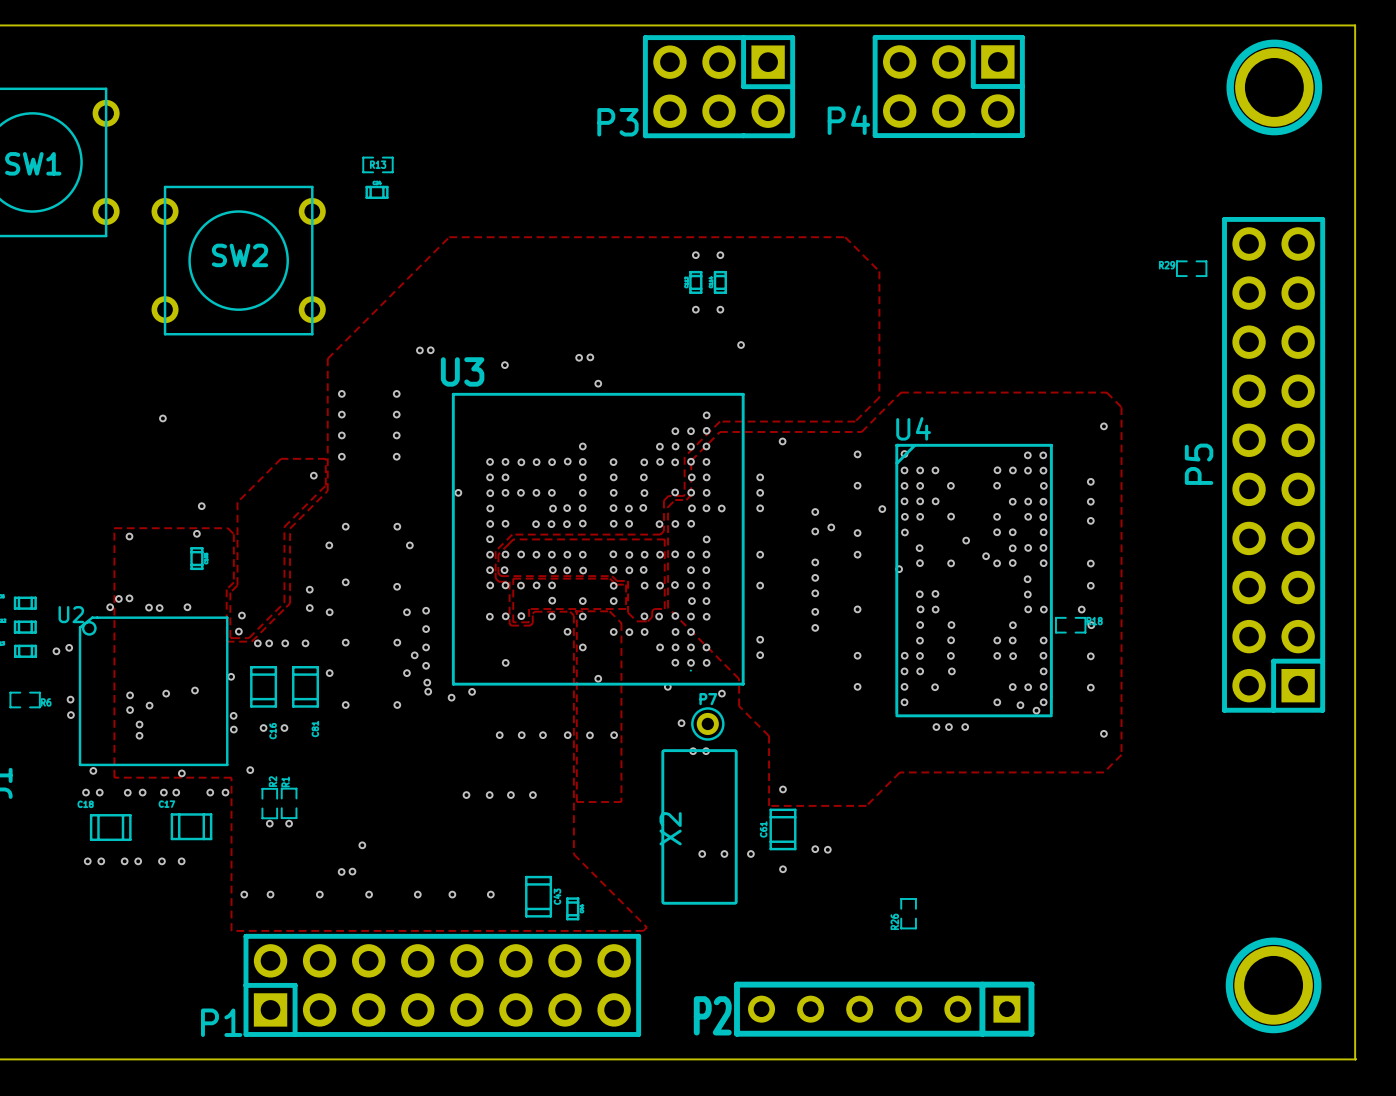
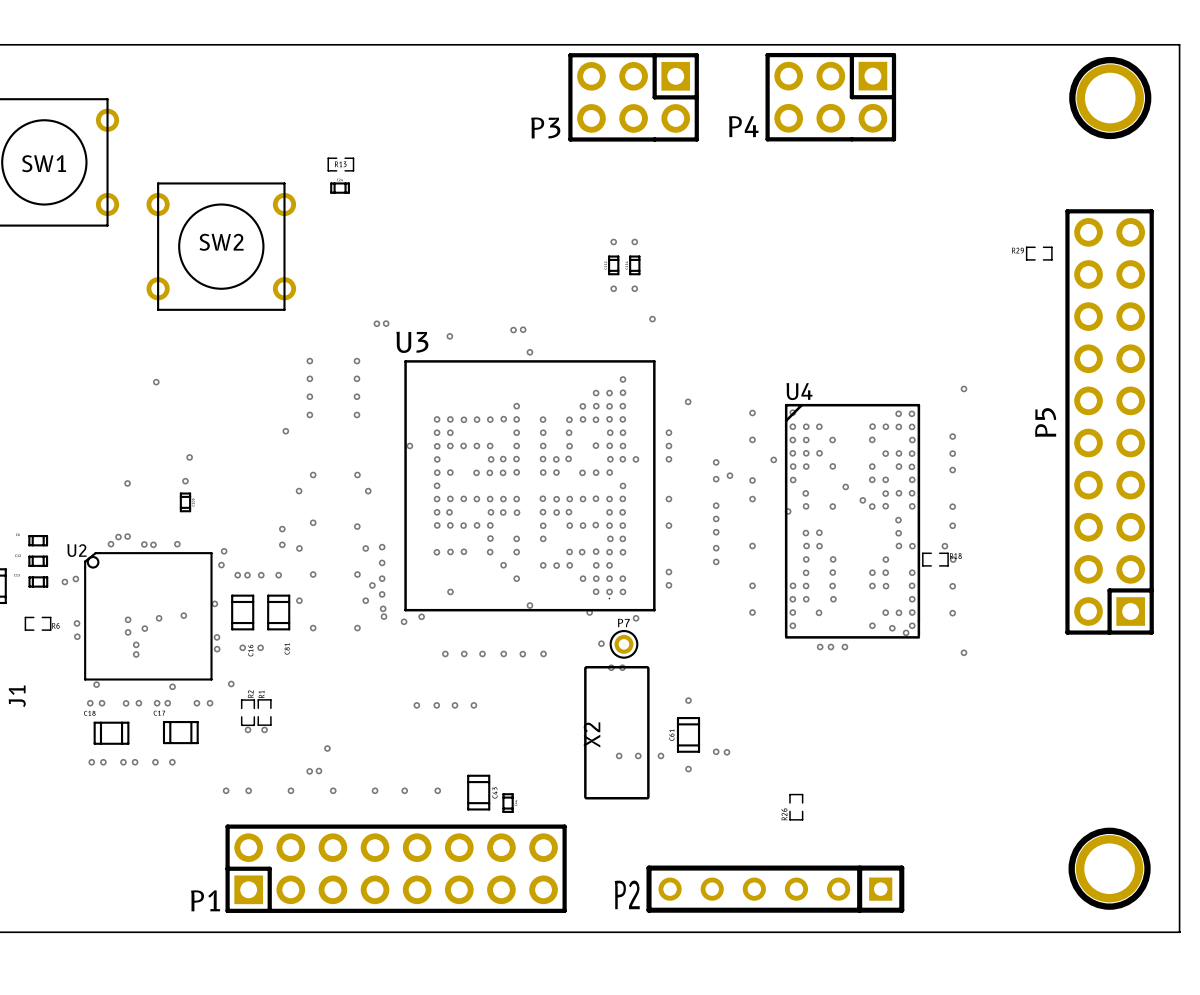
zone outline: (280, 458) (325, 458) (325, 485) (284, 526) (284, 602) (248, 638) (230, 638) (230, 592) (237, 585) (237, 502) (280, 458) -> none
zone outline: (667, 507) (675, 500) (686, 500) (691, 495) (691, 460) (719, 431) (861, 431) (901, 392) (1106, 392) (1121, 407) (1121, 754) (1103, 772) (899, 772) (866, 805) (769, 805) (769, 736) (739, 706) (739, 678) (668, 607) (668, 507) -> none
zone outline: (114, 528) (227, 528) (233, 534) (233, 582) (226, 589) (226, 641) (251, 641) (290, 603) (290, 528) (327, 490) (327, 358) (449, 237) (845, 237) (879, 271) (879, 397) (855, 421) (719, 421) (684, 456) (684, 495) (668, 495) (663, 500) (663, 531) (660, 534) (512, 534) (495, 551) (495, 578) (498, 581) (509, 581) (511, 625) (530, 625) (532, 623) (532, 613) (534, 611) (570, 611) (573, 615) (573, 854) (646, 927) (643, 930) (231, 930) (231, 777) (114, 777) (114, 528) -> none
zone outline: (513, 539) (664, 539) (664, 608) (654, 608) (652, 611) (652, 617) (647, 621) (636, 621) (628, 612) (628, 580) (617, 580) (612, 576) (501, 576) (498, 573) (498, 554) (513, 539) -> none
zone outline: (513, 578) (513, 622) (529, 622) (529, 608) (626, 608) (626, 584) (616, 584) (610, 578) (513, 578) -> none
zone outline: (576, 611) (576, 802) (621, 802) (621, 623) (609, 611) (575, 611) (577, 611) -> none

